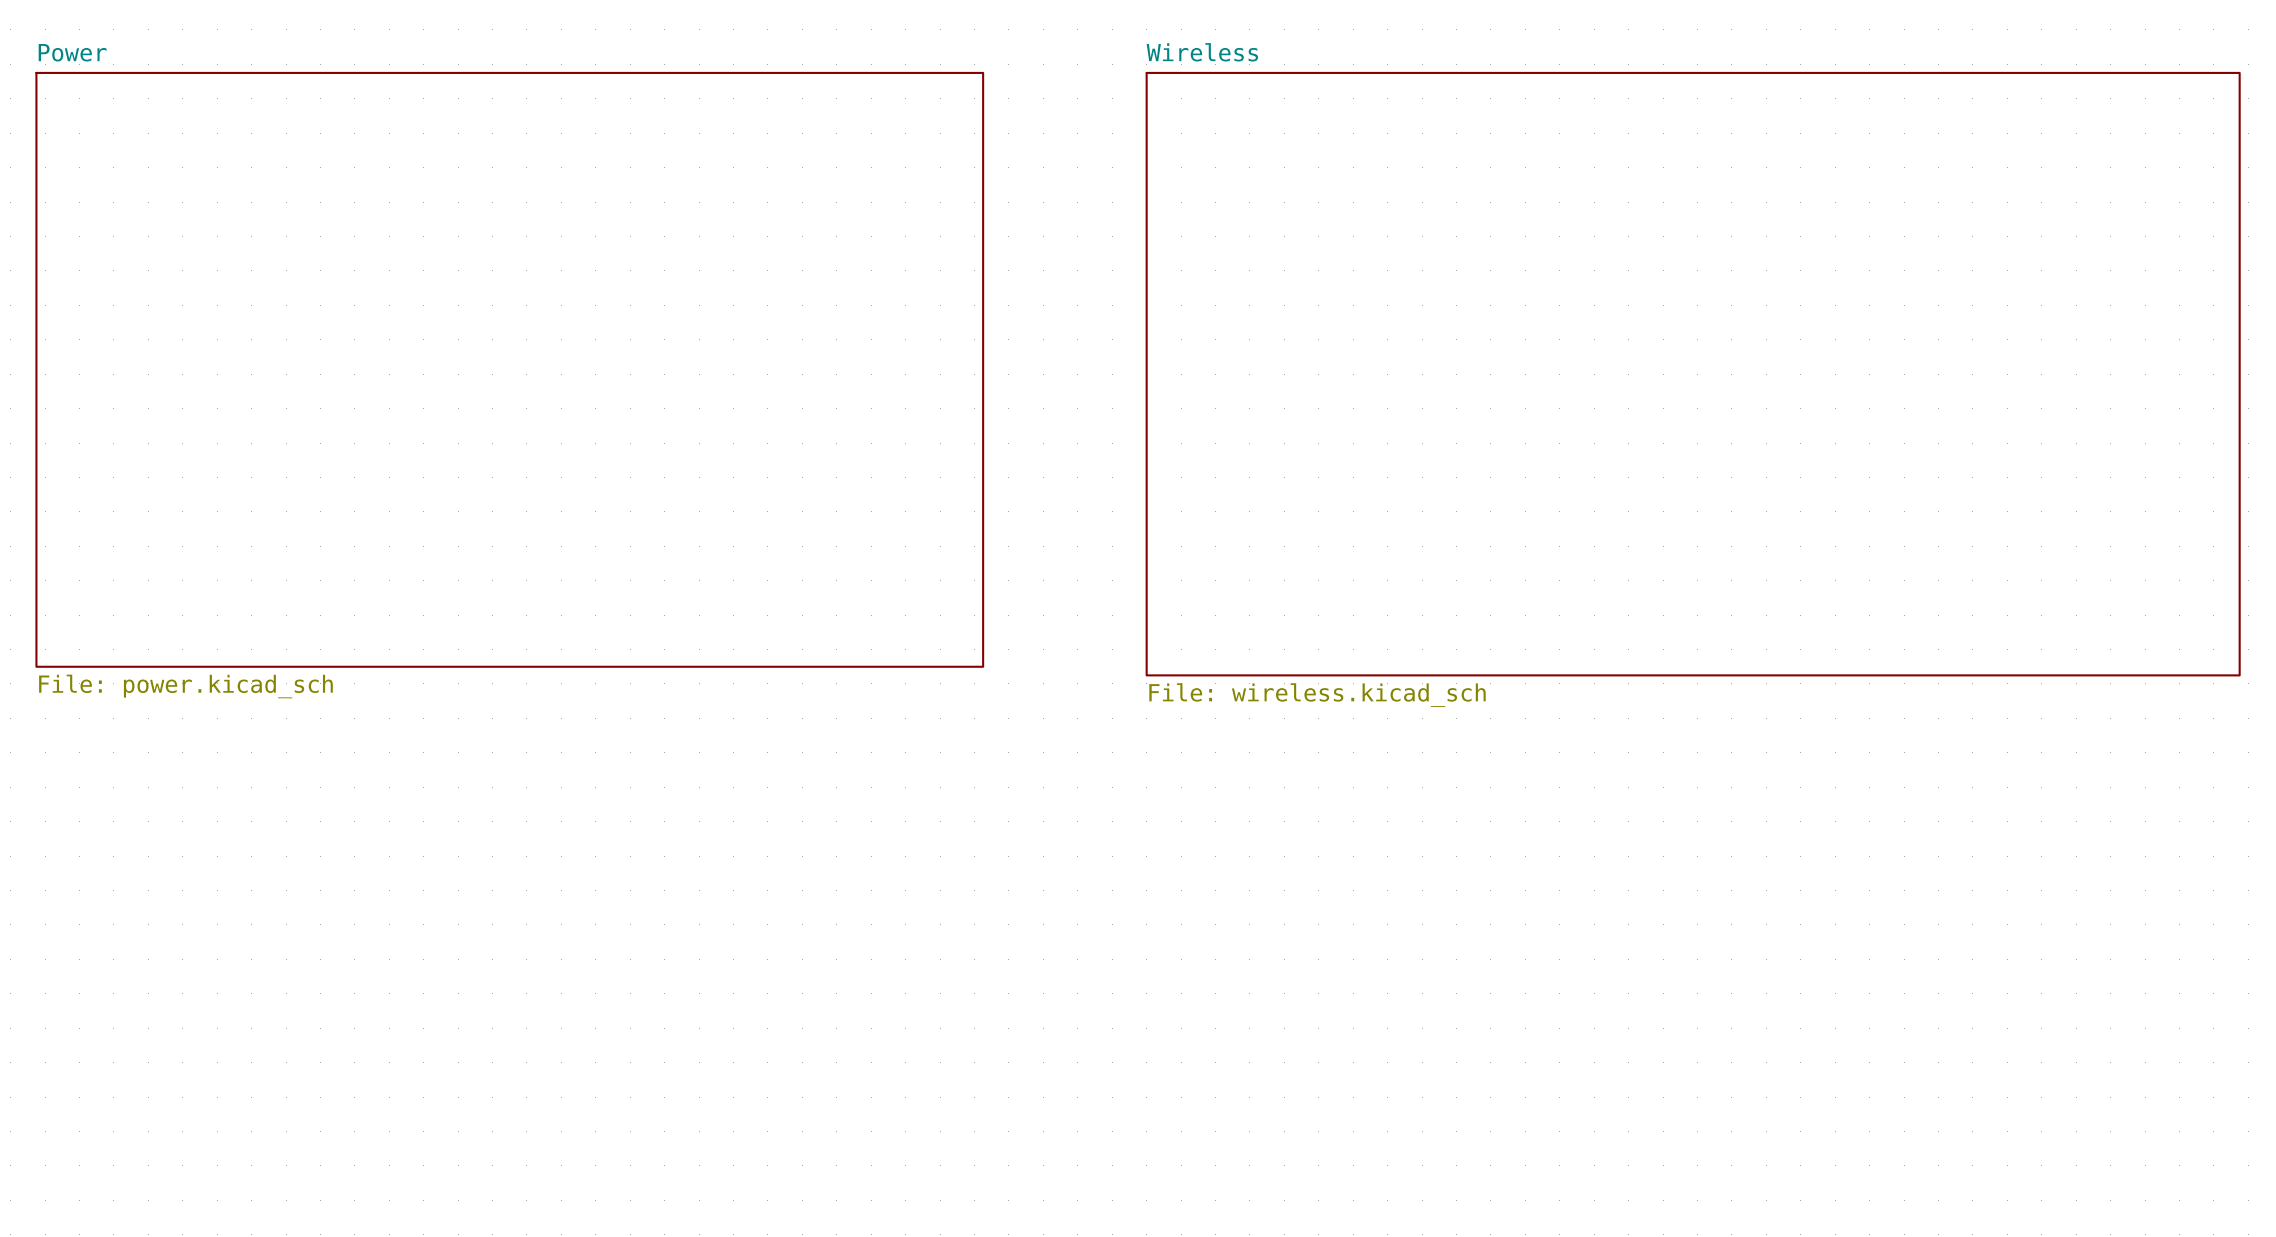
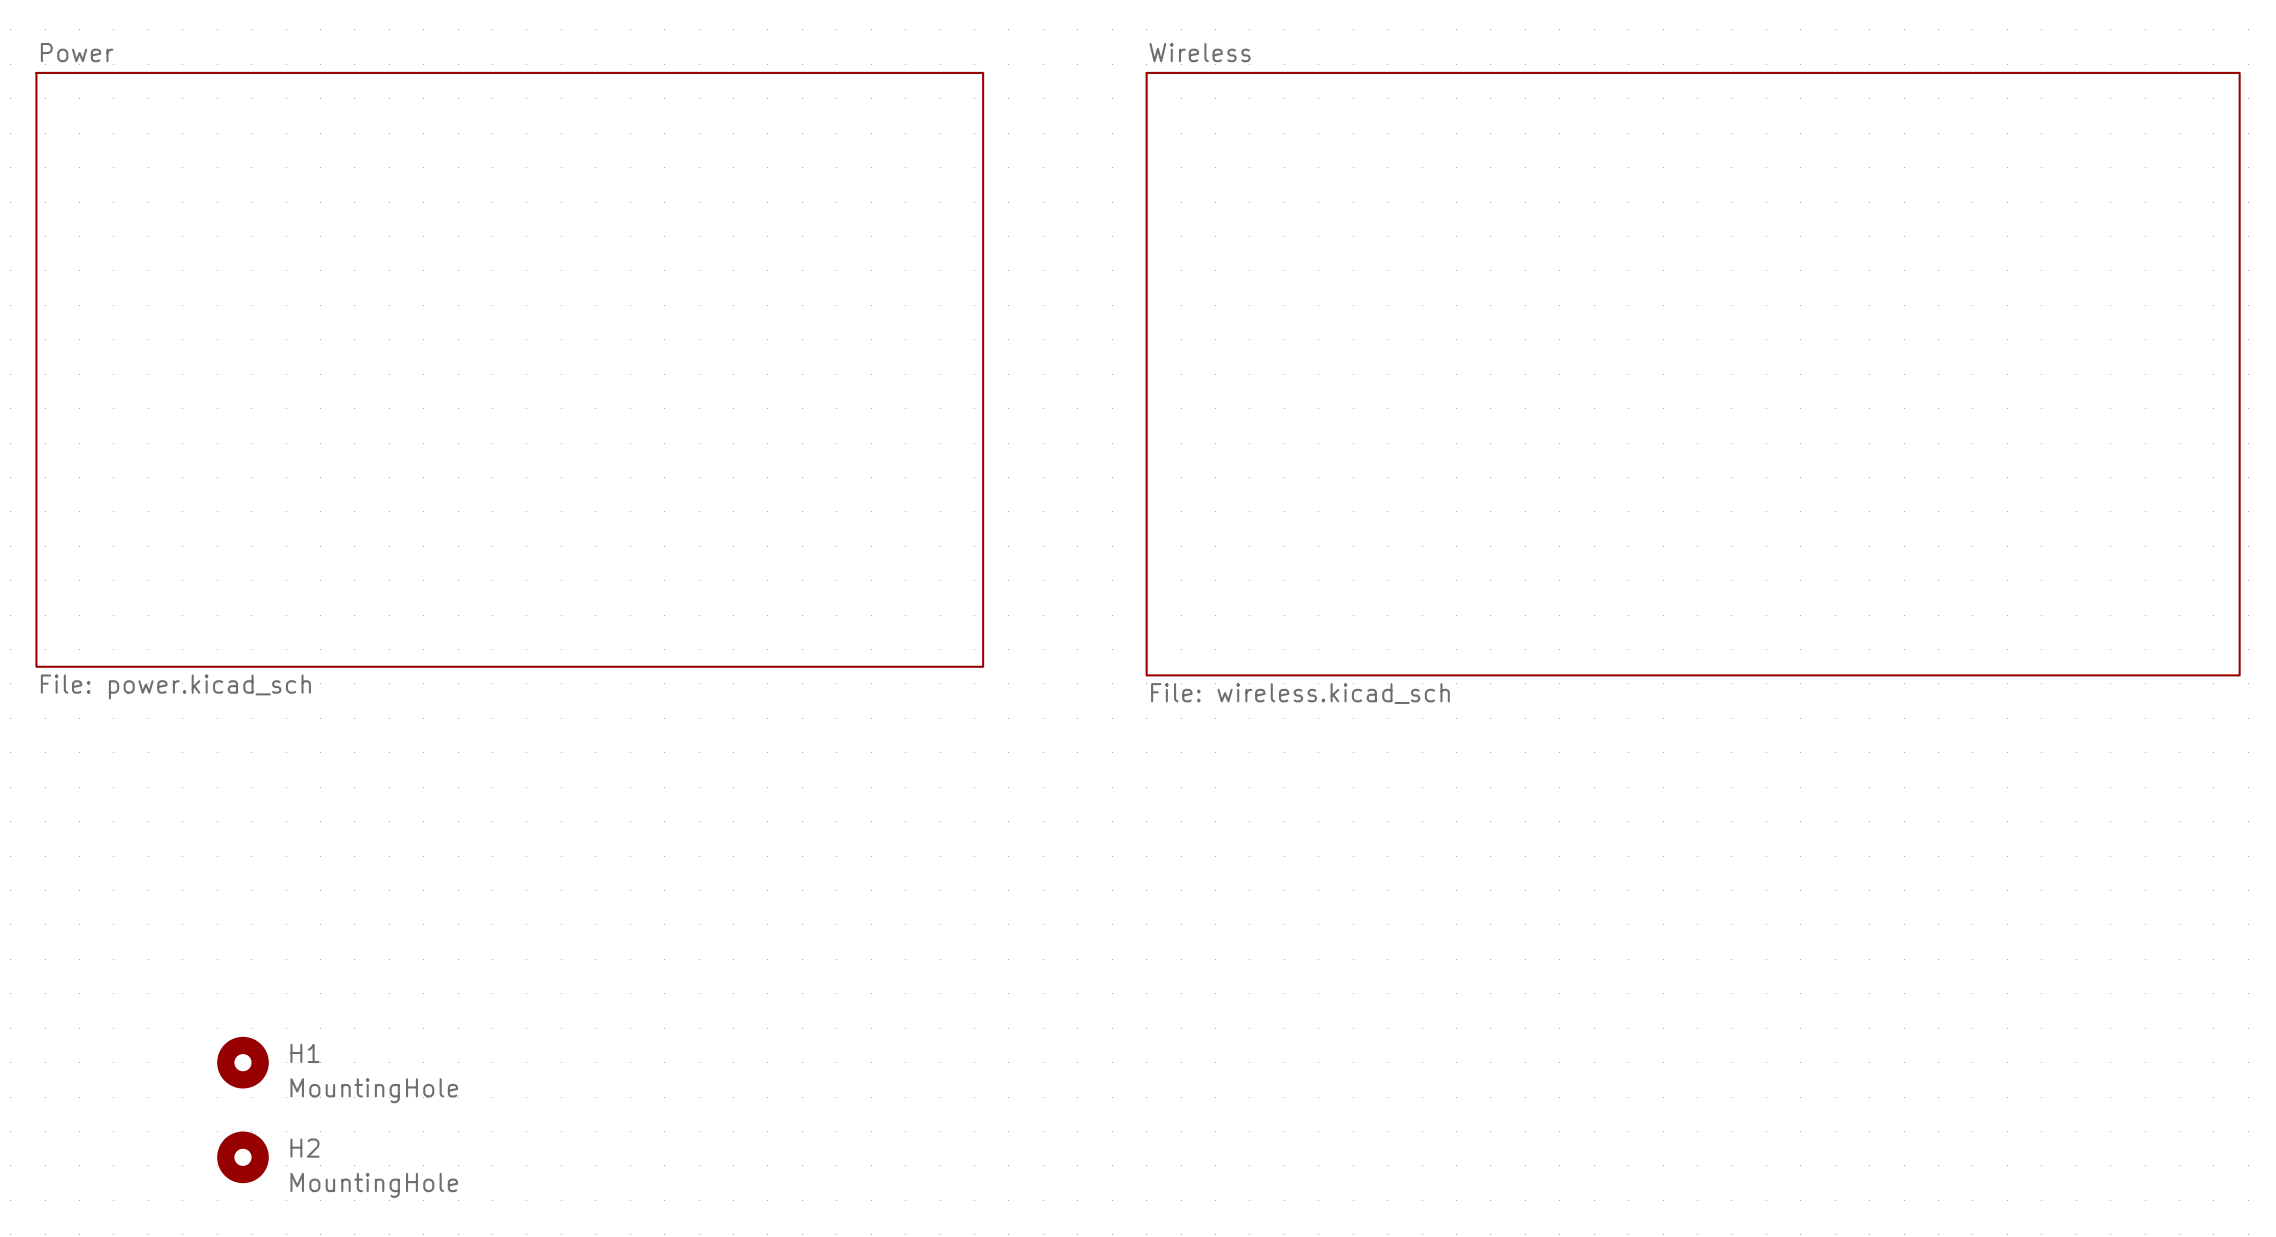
H1: none -> MountingHole (242, 1062)
H2: none -> MountingHole (242, 1157)

